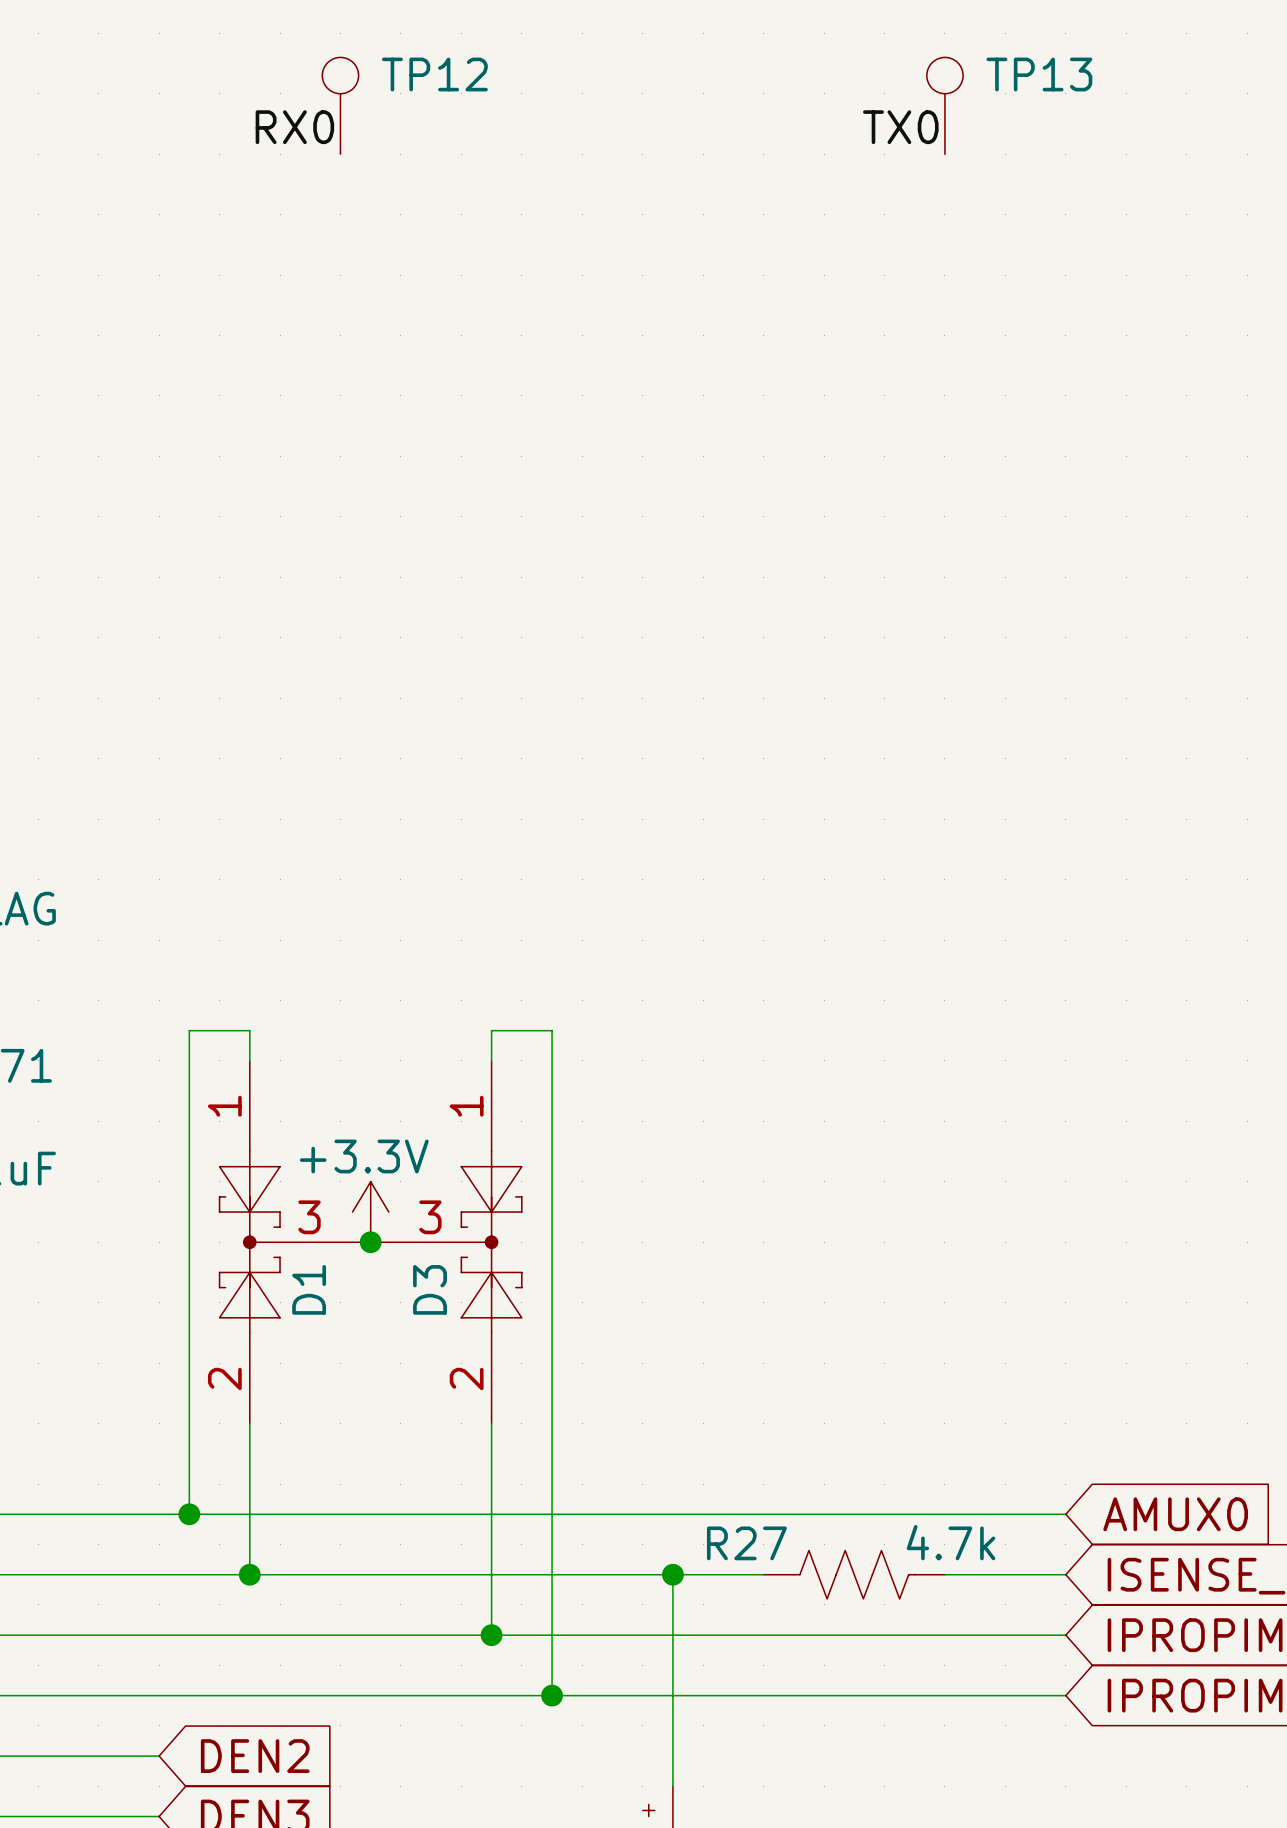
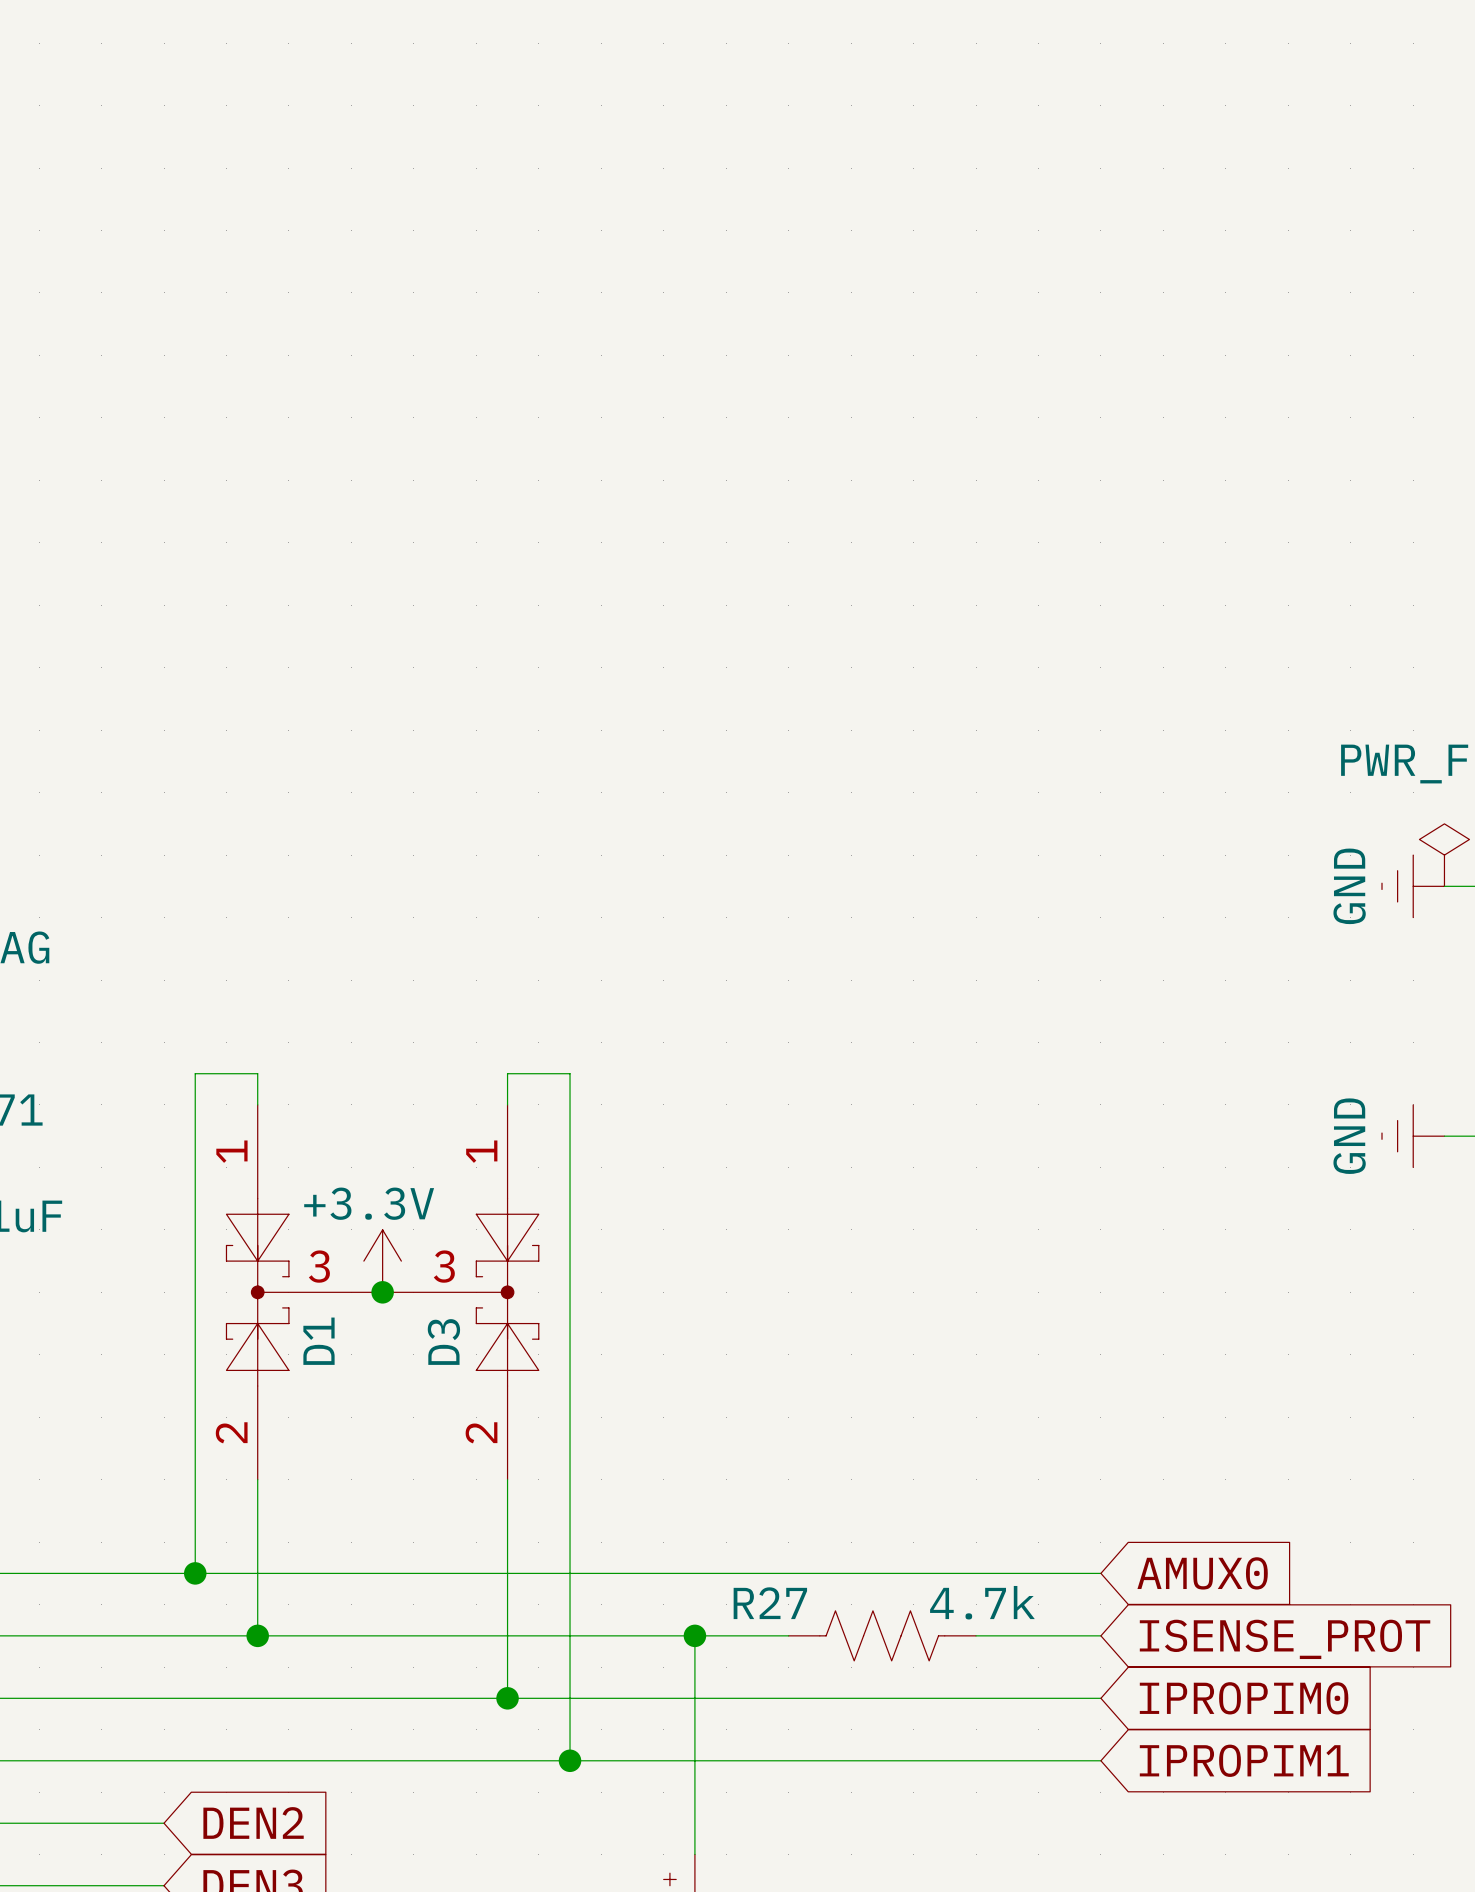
TP12: (340, 105) -> none
TP13: (944, 105) -> none
label: RX0 (294, 127) -> none
label: TX0 (900, 127) -> none

